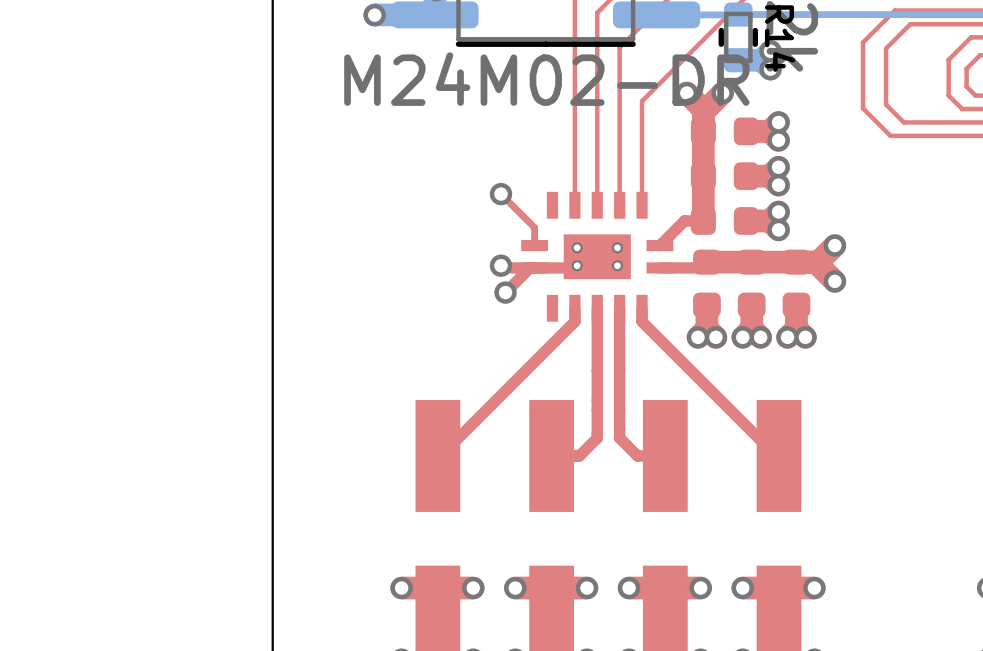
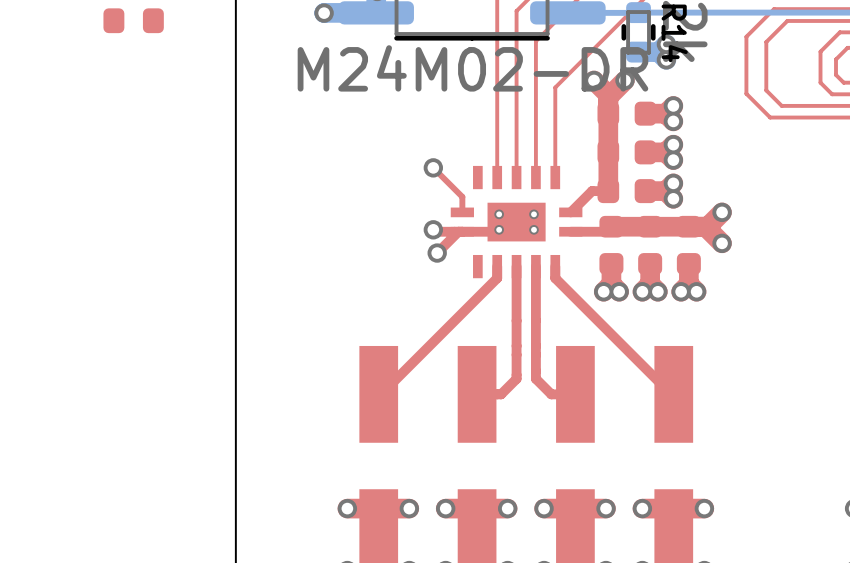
part: none -> (133, 20)

